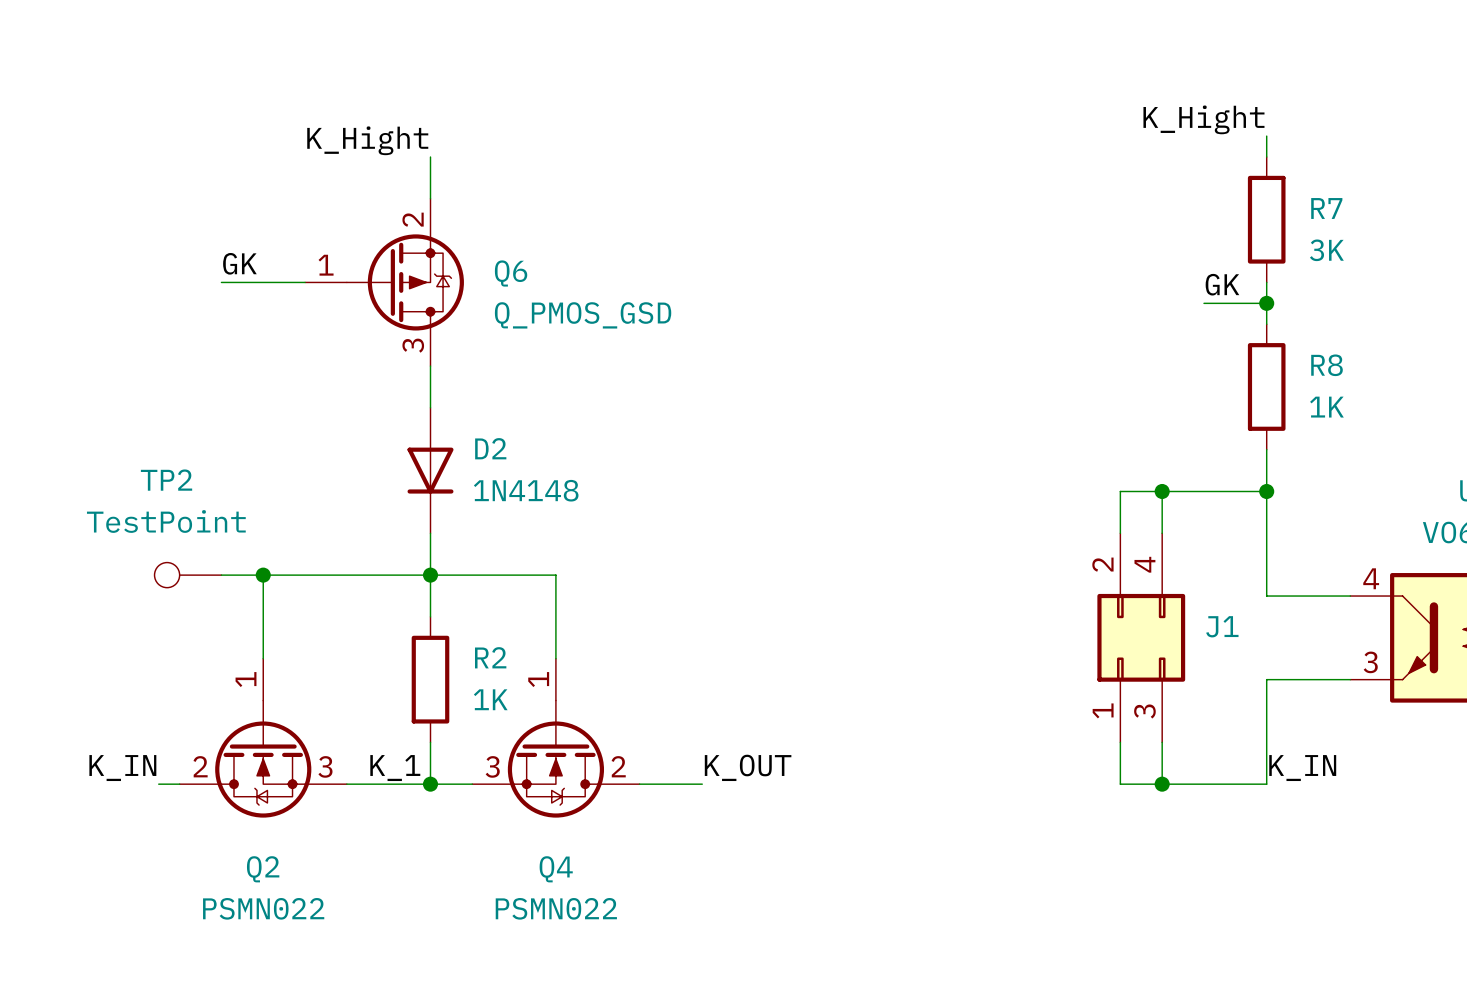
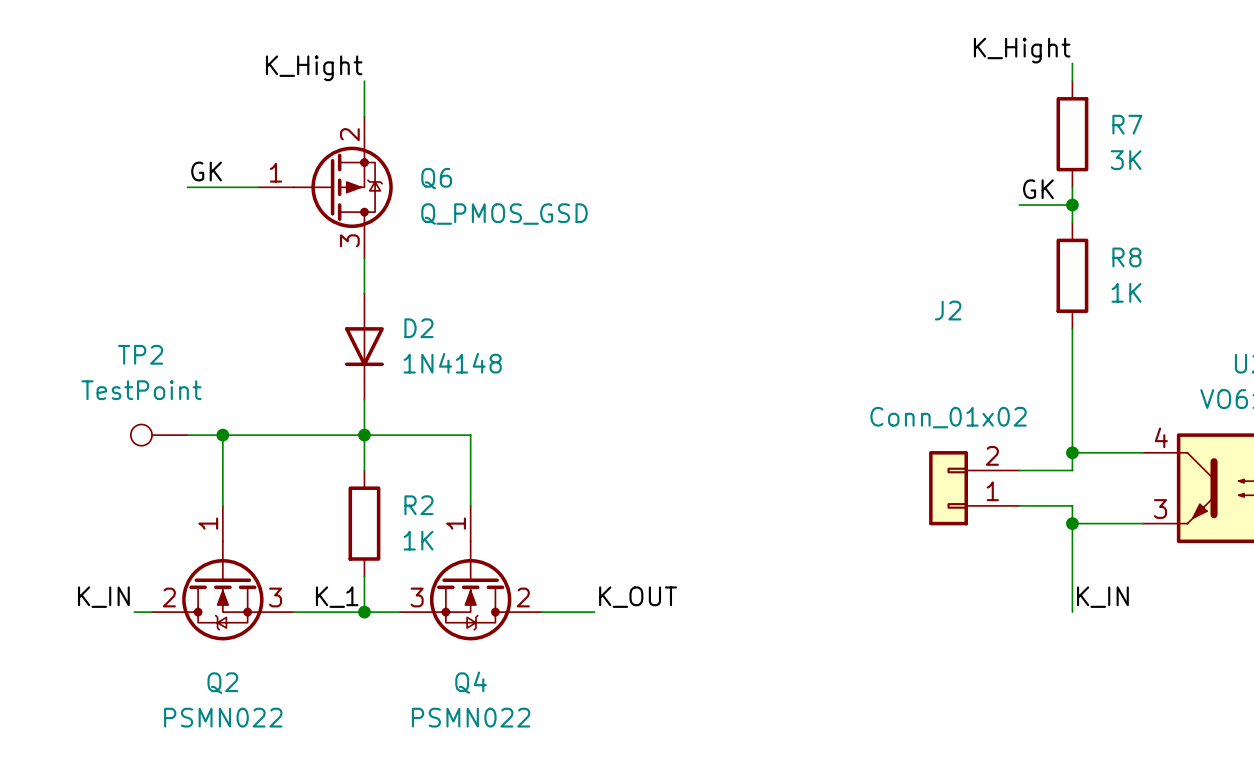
wire: (1162, 491) (1162, 533) -> none
junction: (1162, 491) -> none
wire: (1266, 491) (1120, 491) (1120, 533) -> none
junction: (1266, 491) -> none
wire: none -> (1072, 452) (1072, 470) (1019, 470)
junction: none -> (1072, 452)
J1: (1141, 637) -> none
J2: none -> Conn_01x02 (974, 488)
wire: none -> (1019, 505) (1072, 505) (1072, 523)
junction: none -> (1072, 523)
wire: (1120, 742) (1120, 784) (1266, 784) -> none
wire: (1162, 742) (1162, 784) -> none
junction: (1162, 784) -> none

